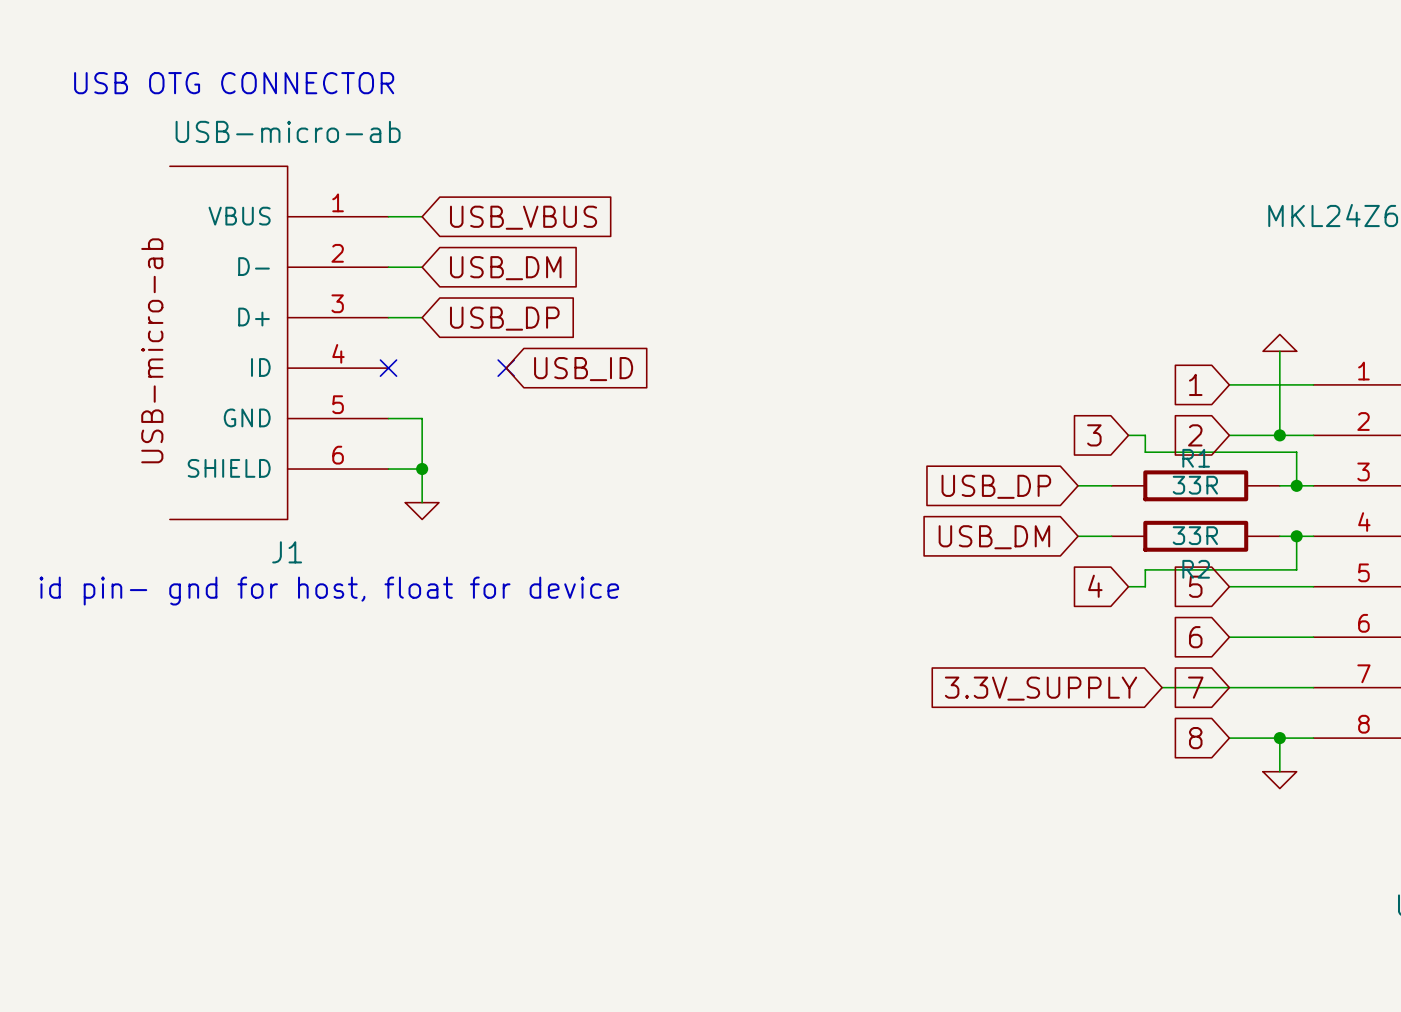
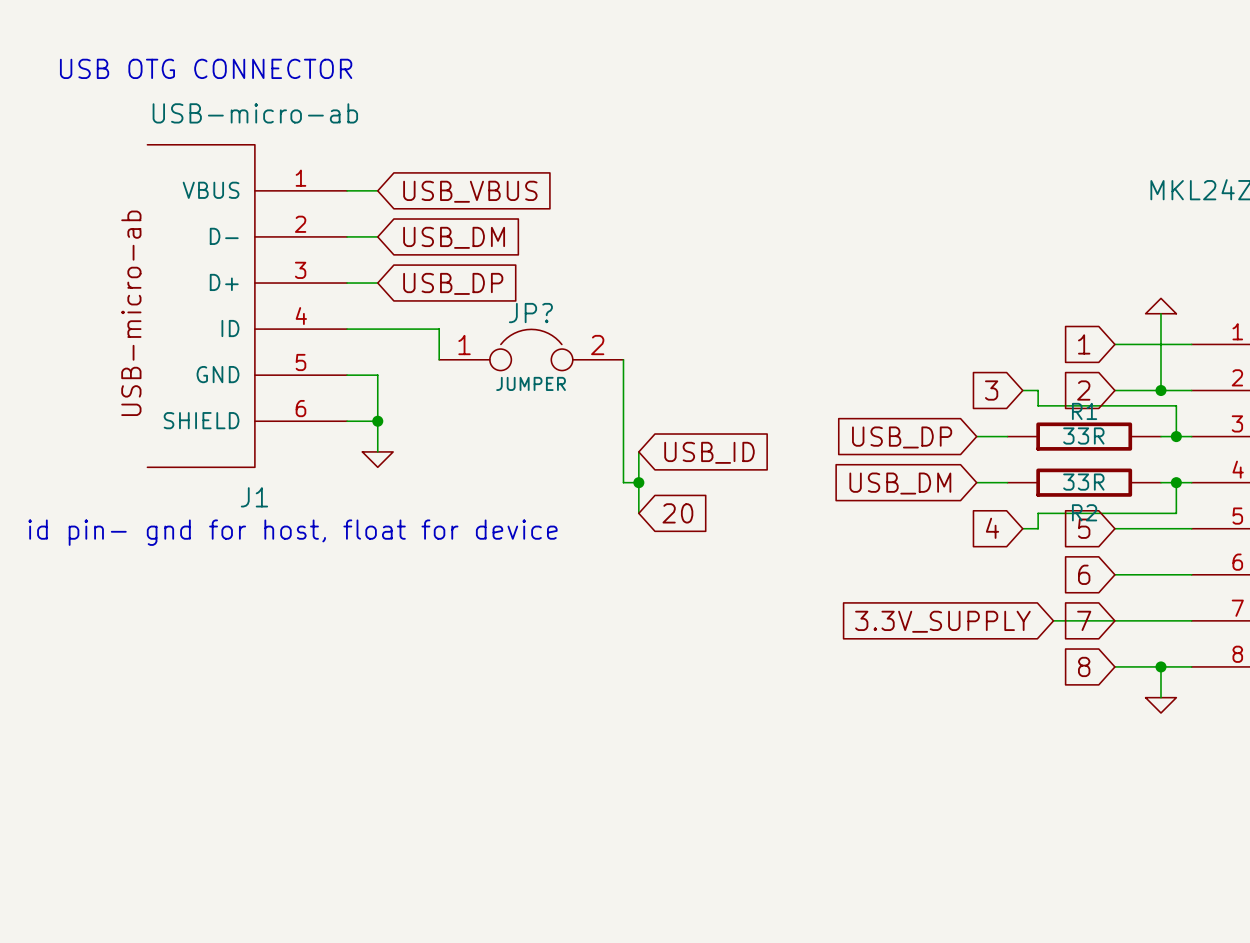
wire: none -> (347, 329) (439, 329) (439, 359)
no-connect mark: (388, 368) -> none
no-connect mark: (506, 368) -> none
global label position: USB_ID (583, 369) -> USB_ID (709, 452)
JP?: none -> JUMPER (531, 349)
wire: none -> (623, 359) (623, 482) (638, 482)
wire: none -> (638, 451) (638, 513)
junction: none -> (638, 482)
global label: none -> 20 (677, 513)

